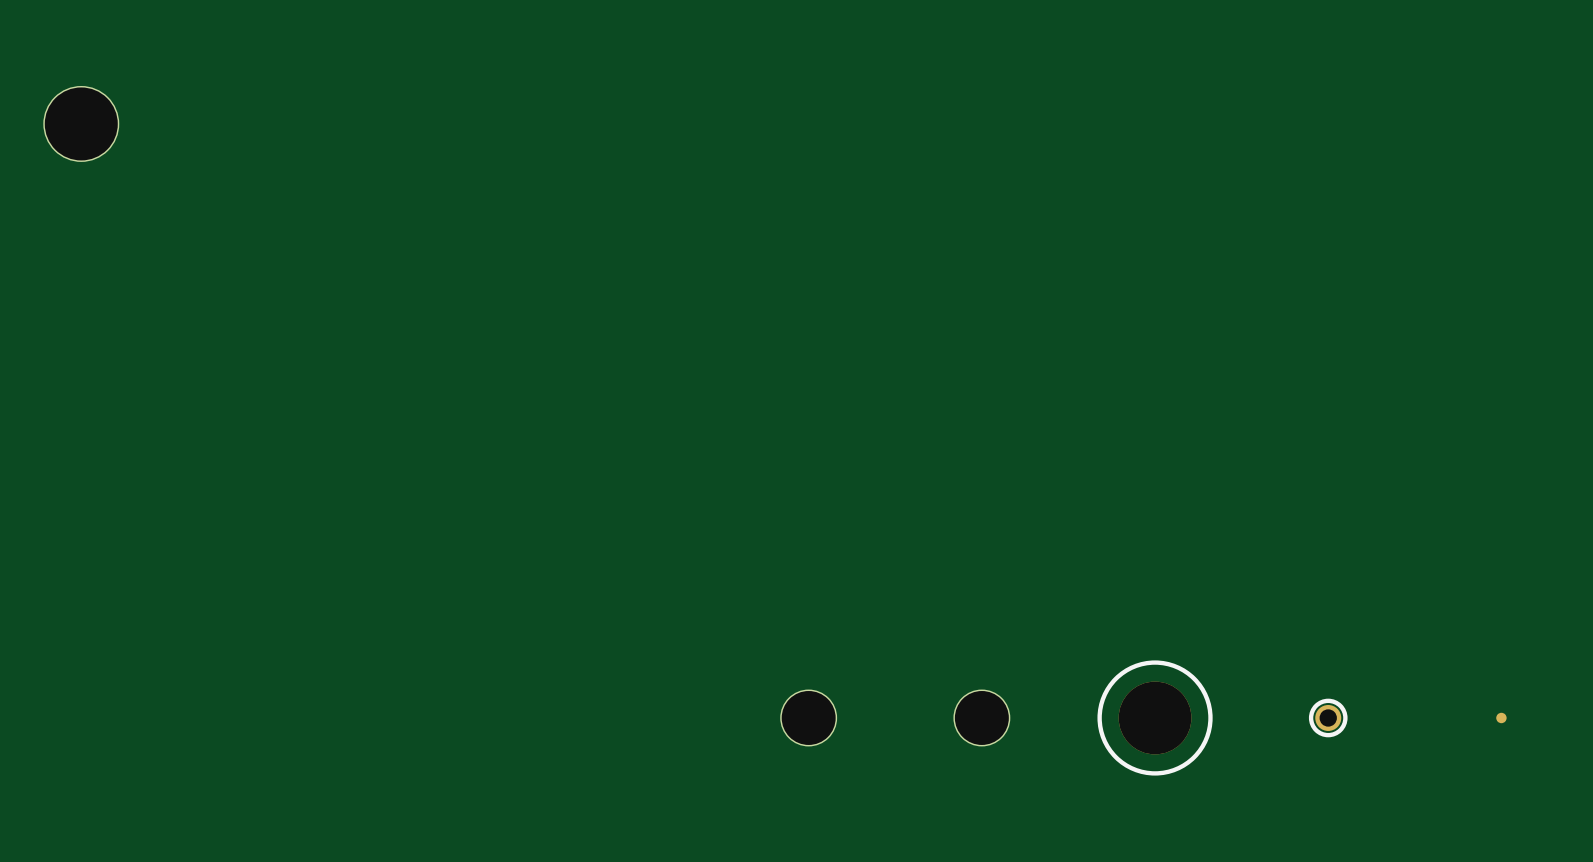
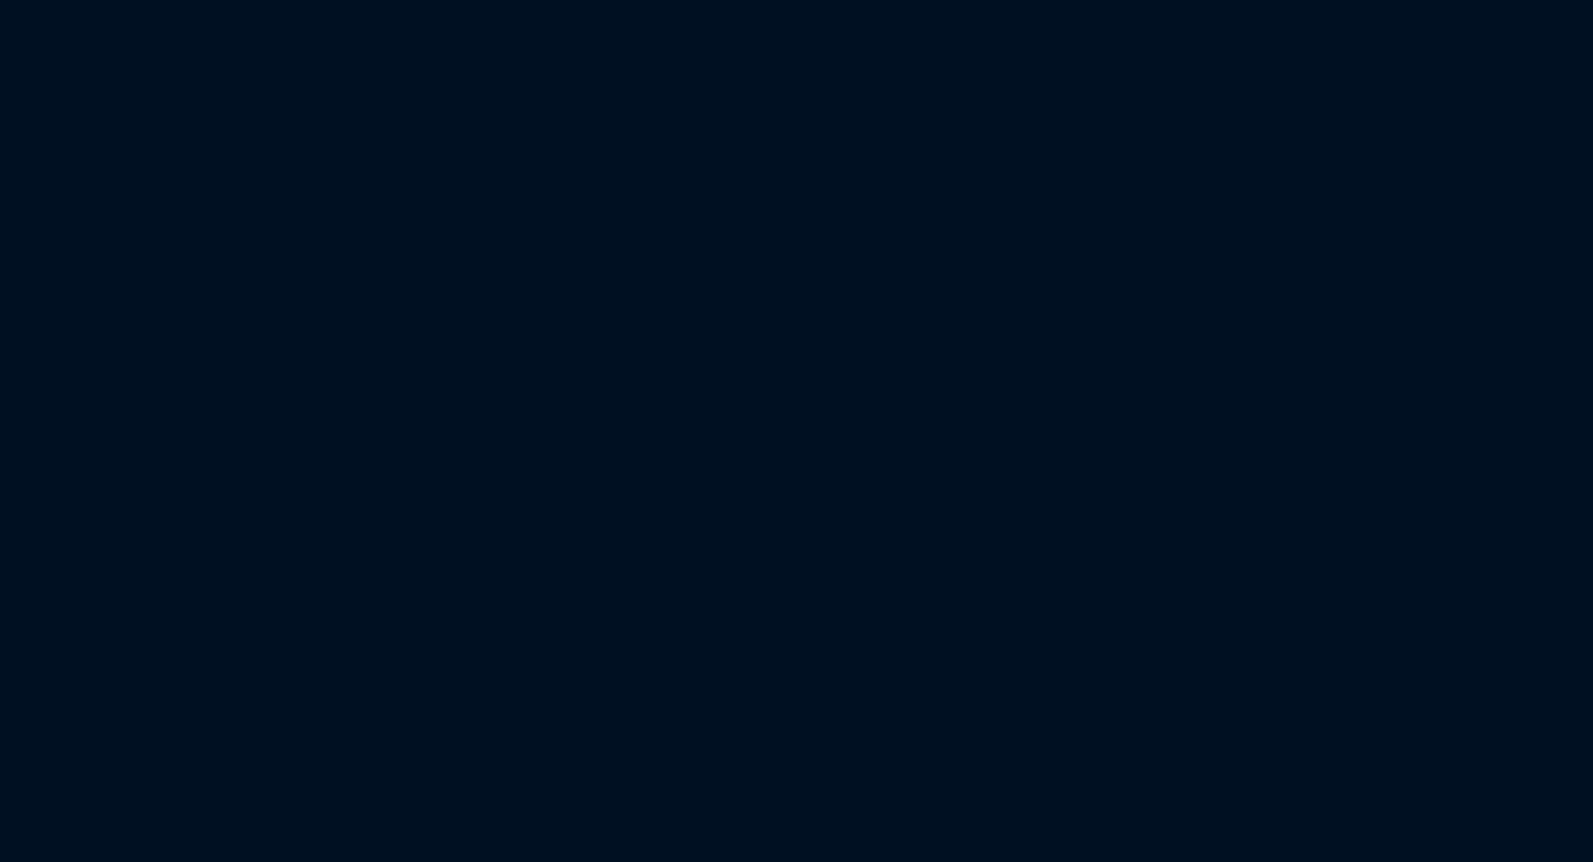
part: (81, 123) -> none
part: (808, 717) -> none
part: (981, 717) -> none
part: (1155, 717) -> none
part: (1328, 717) -> none
part: (1501, 717) -> none

